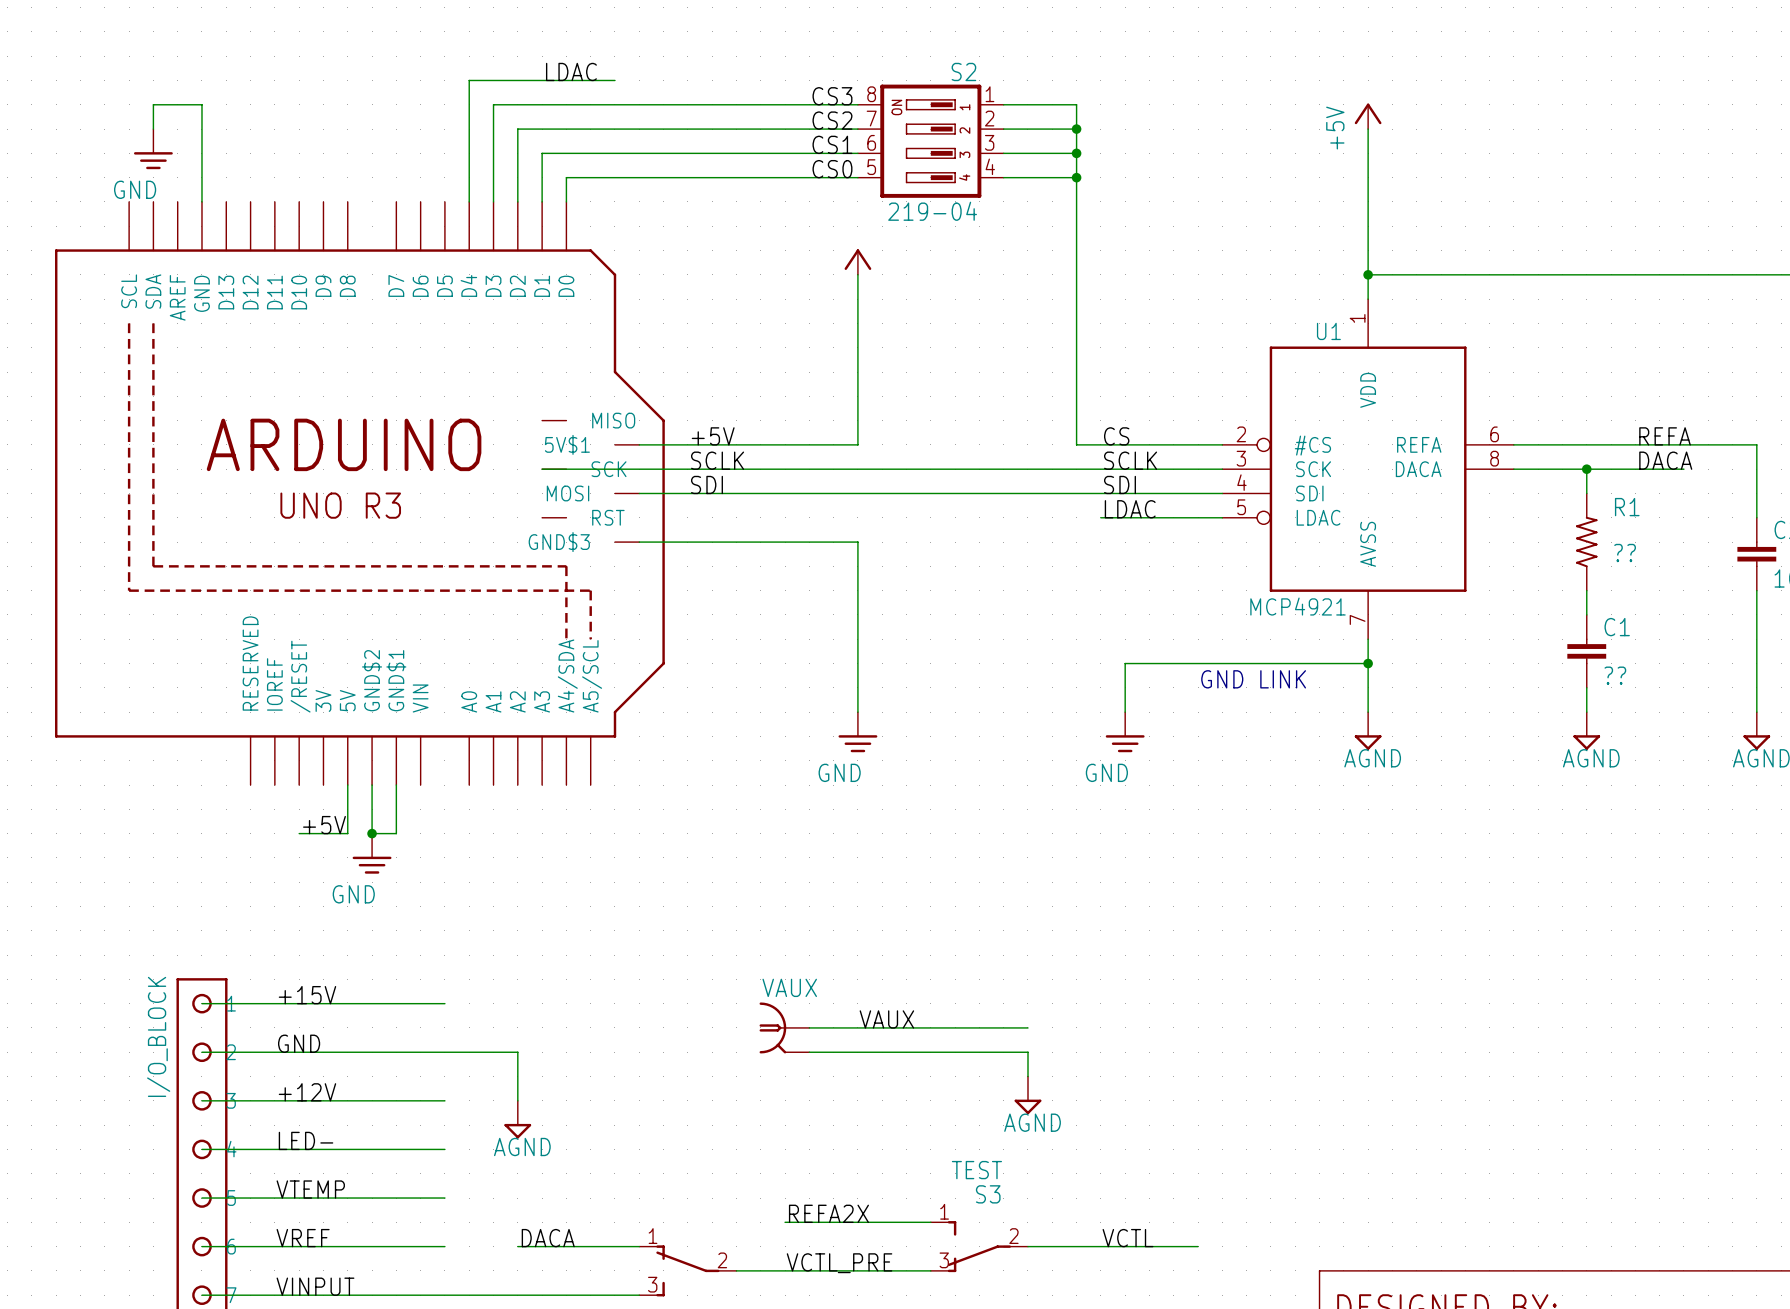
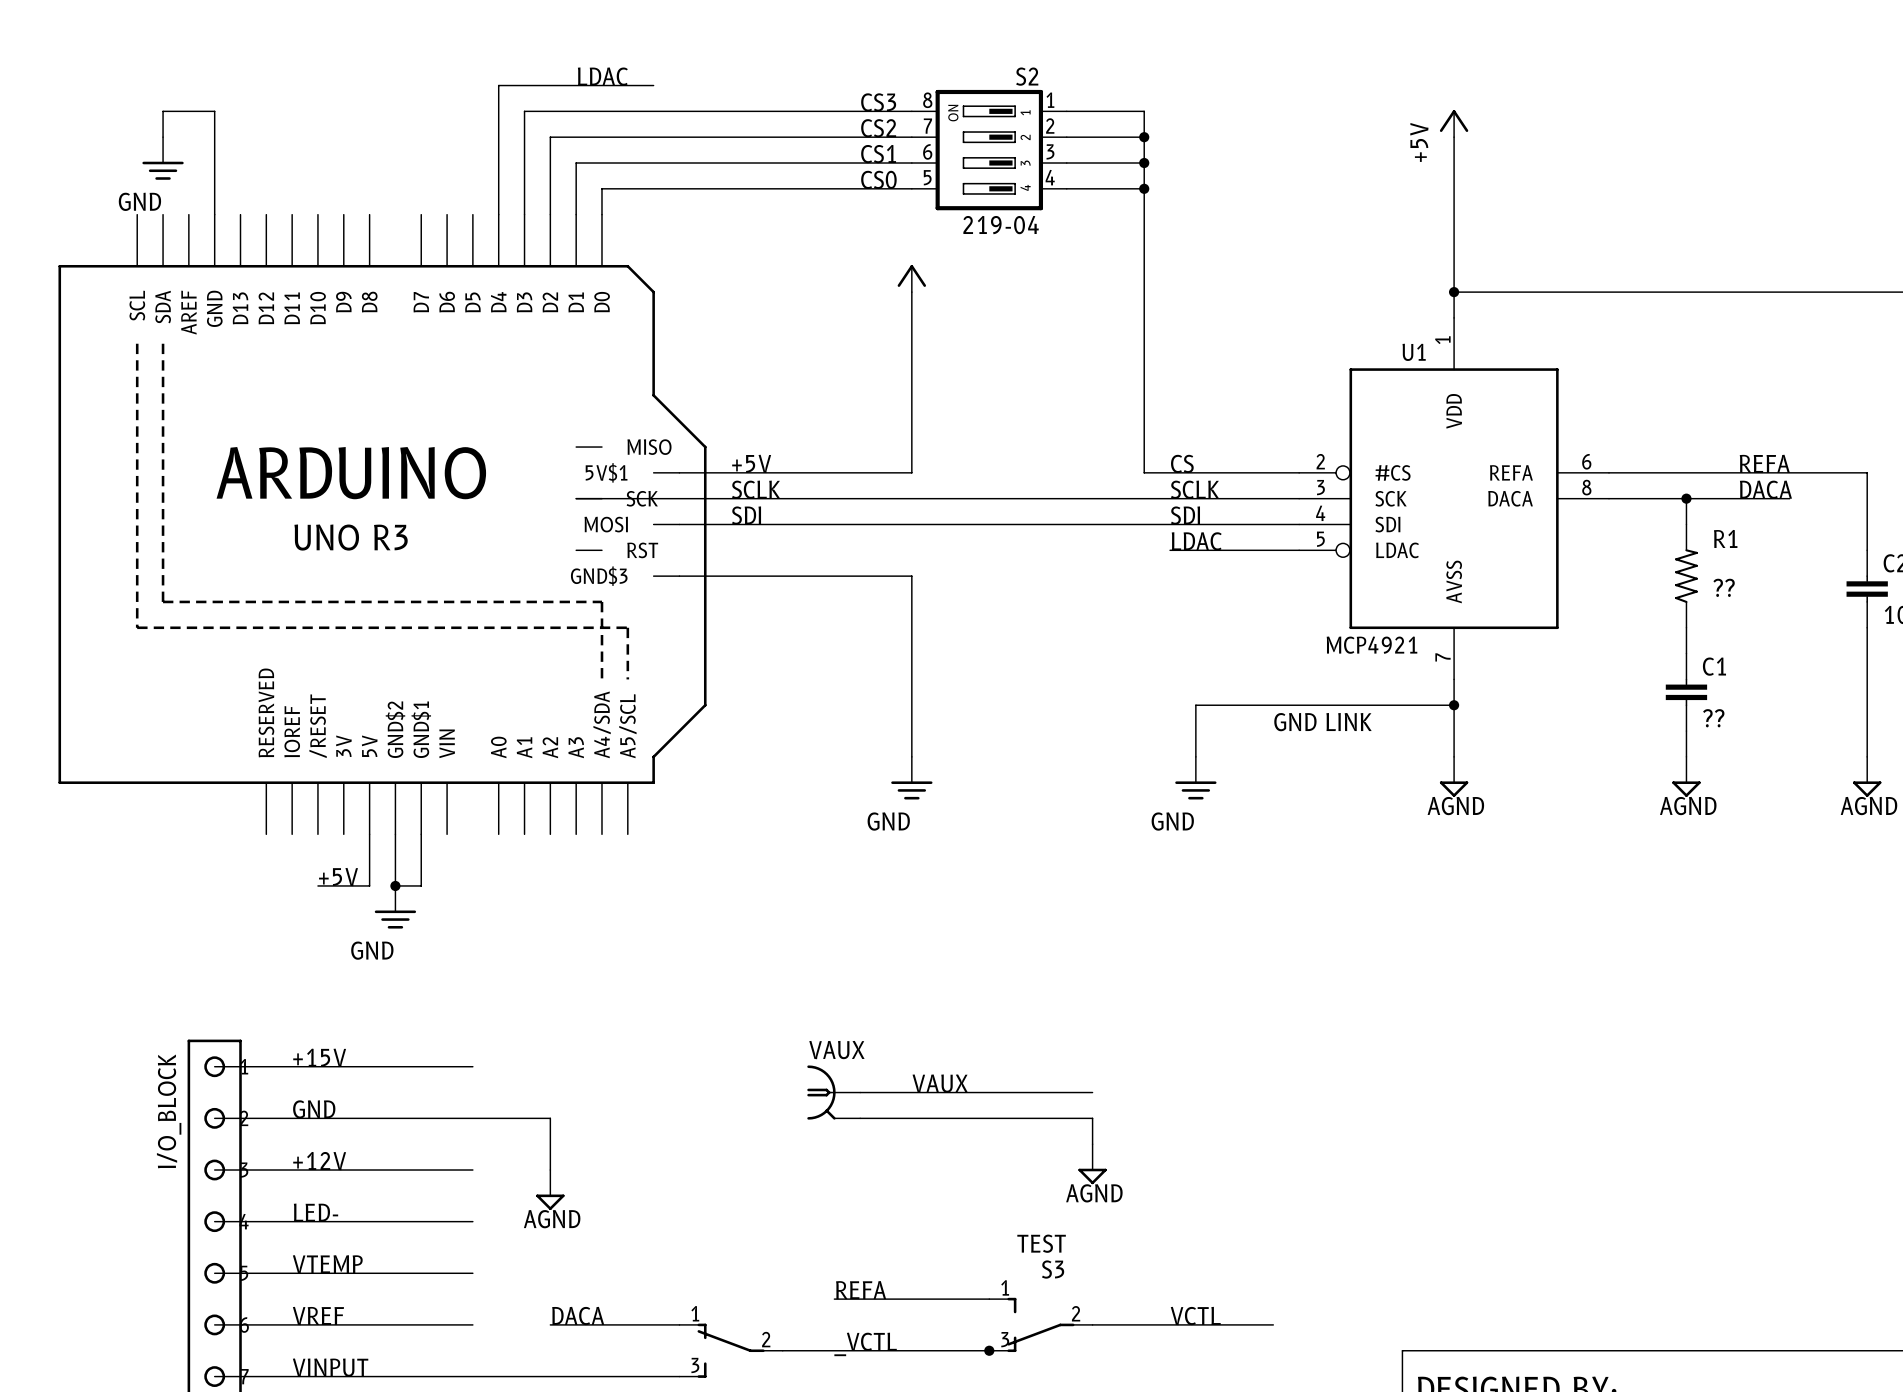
label: REFA2X (828, 1213) -> REFA (861, 1290)
label: VCTL_PRE (839, 1263) -> _VCTL (865, 1344)
junction: none -> (989, 1350)

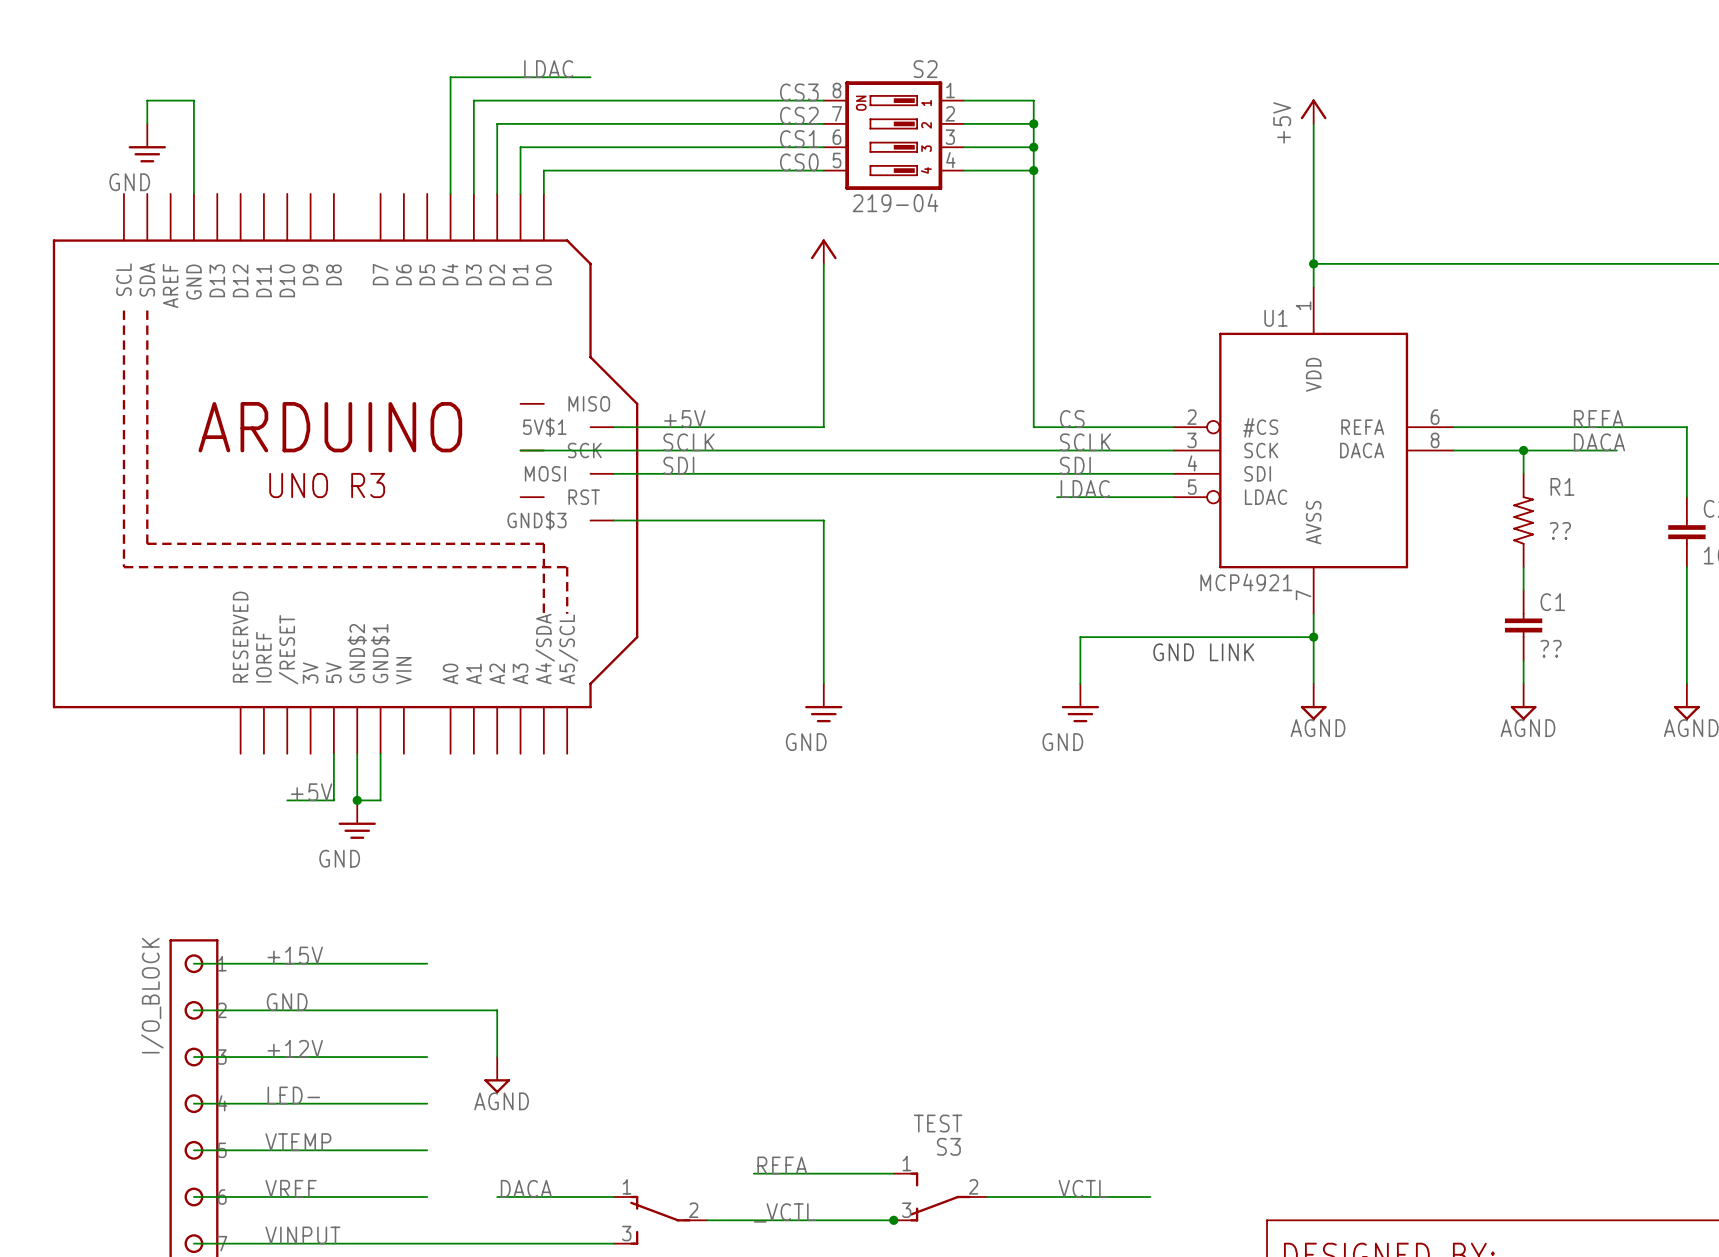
label: VAUX (940, 1083) -> none
VAUX: (833, 1092) -> none
wire: (860, 1092) (1092, 1092) -> none
wire: (860, 1118) (1092, 1118) (1092, 1144) -> none
power symbol: AGND (1092, 1164) -> none

